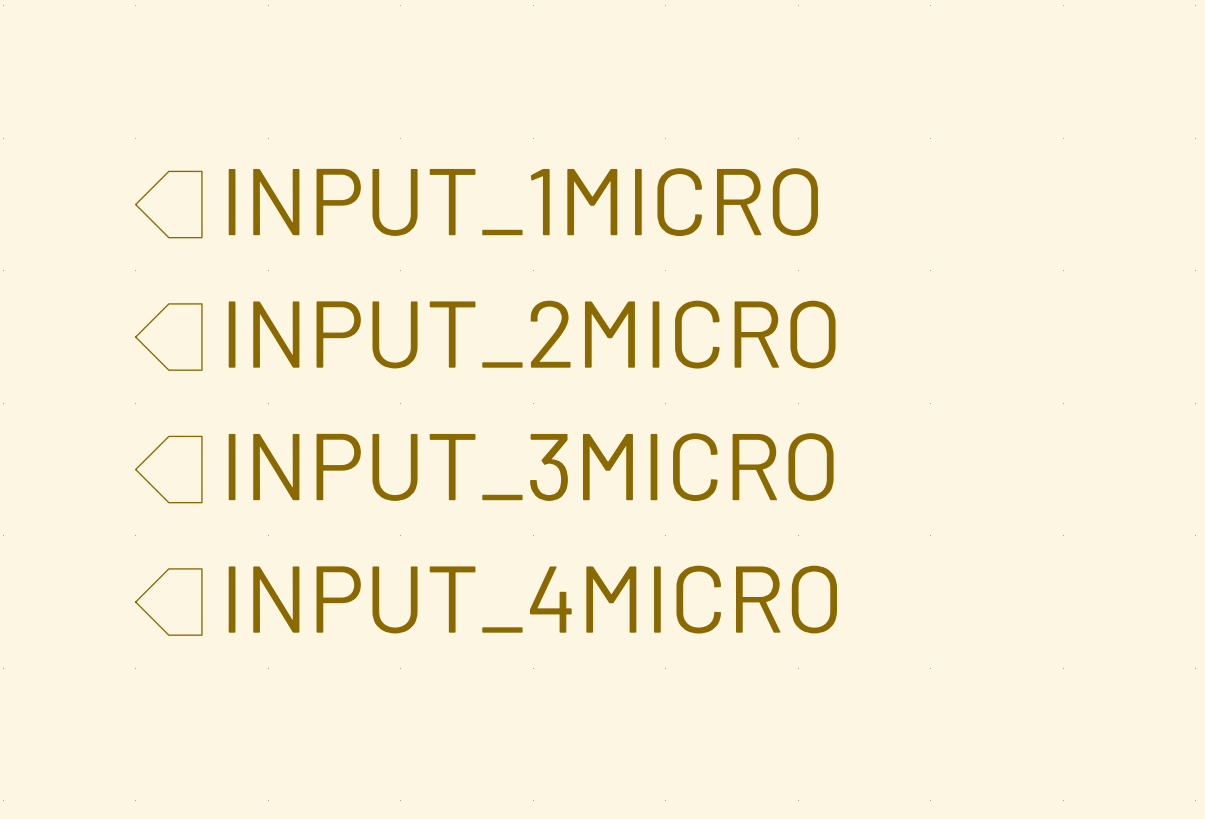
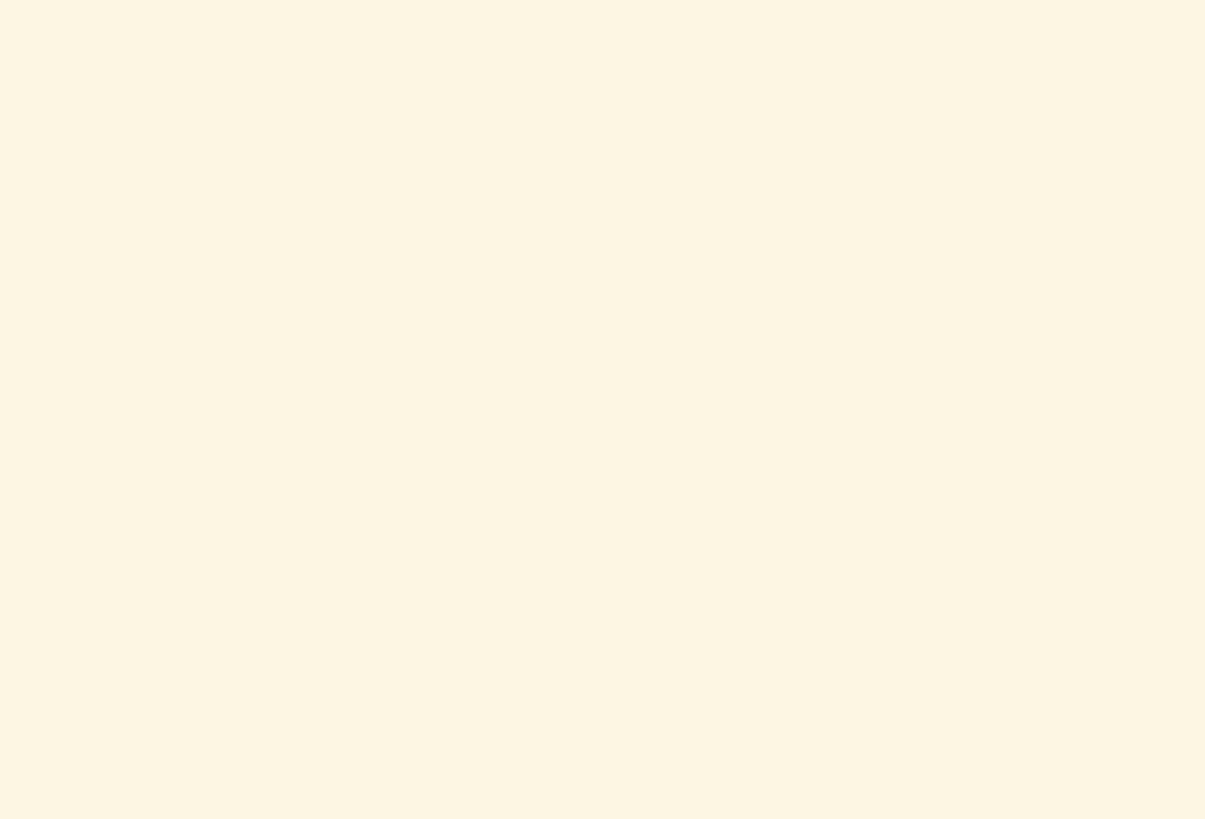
hierarchical label: INPUT_1MICRO (523, 202) -> none
hierarchical label: INPUT_2MICRO (532, 334) -> none
hierarchical label: INPUT_3MICRO (531, 467) -> none
hierarchical label: INPUT_4MICRO (532, 599) -> none

